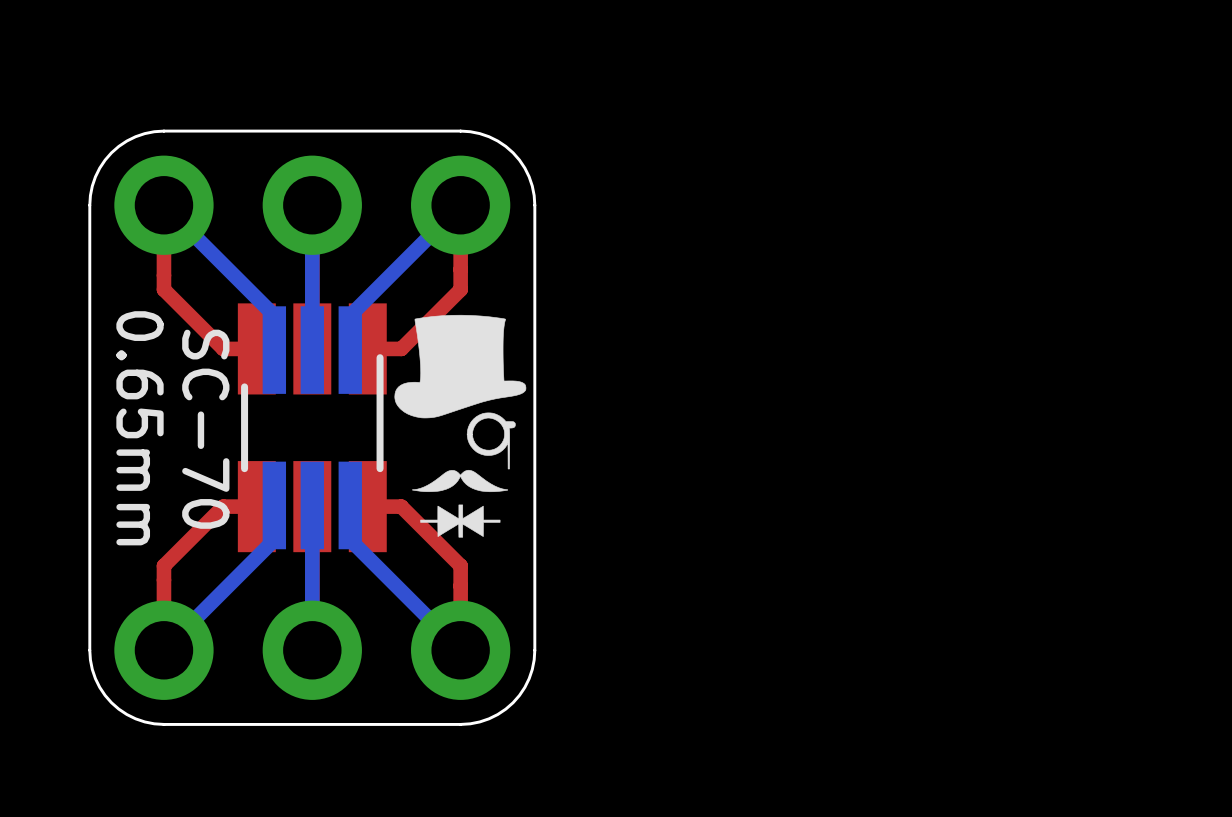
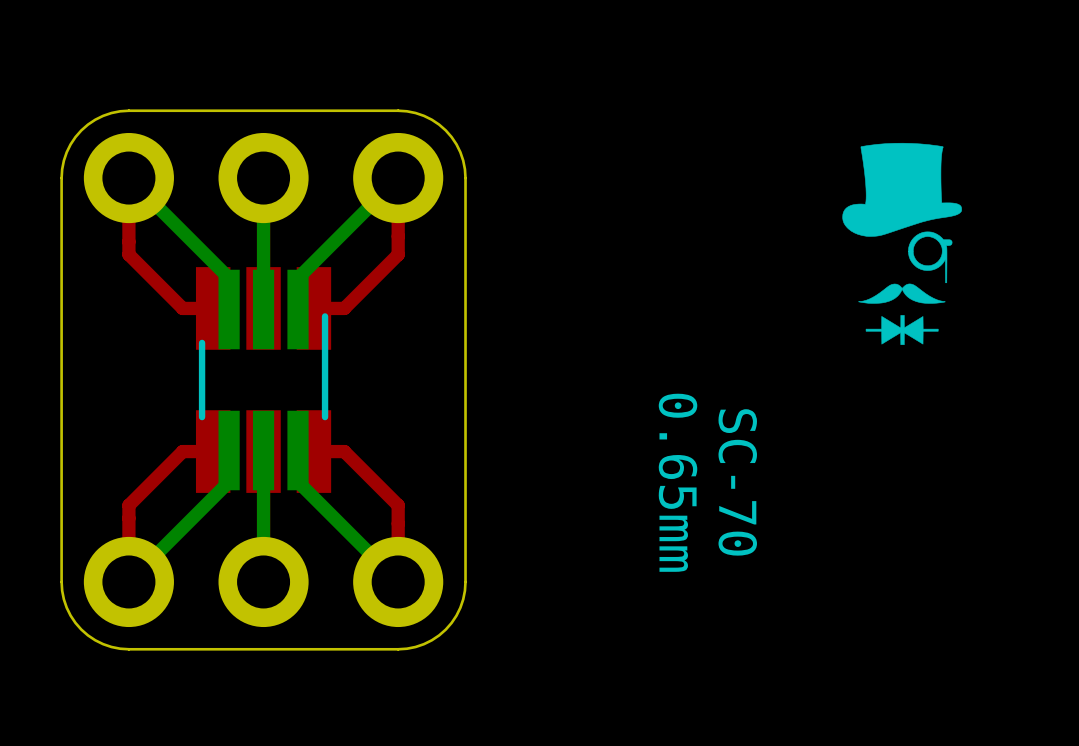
drawing position: (460, 426) -> (902, 243)
text position: 0.65mm (140, 428) -> 0.65mm (678, 482)
text position: SC-70 (205, 429) -> SC-70 (737, 482)

